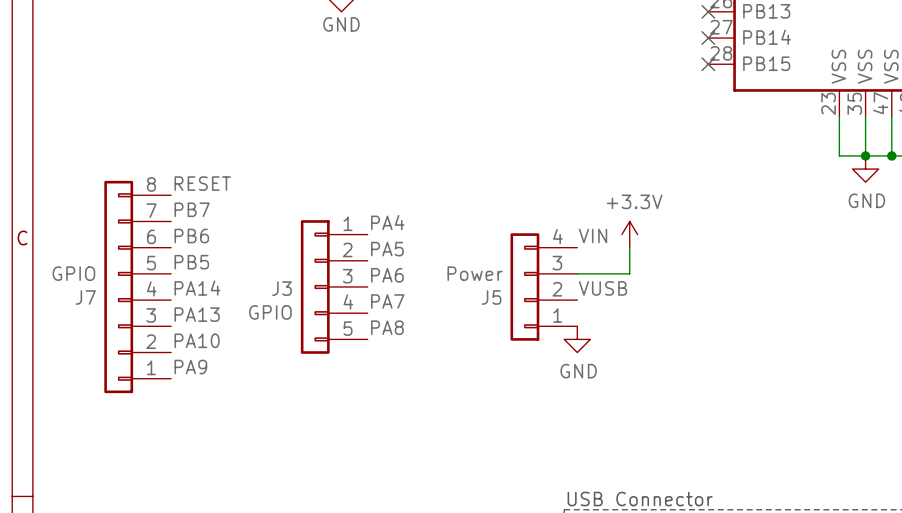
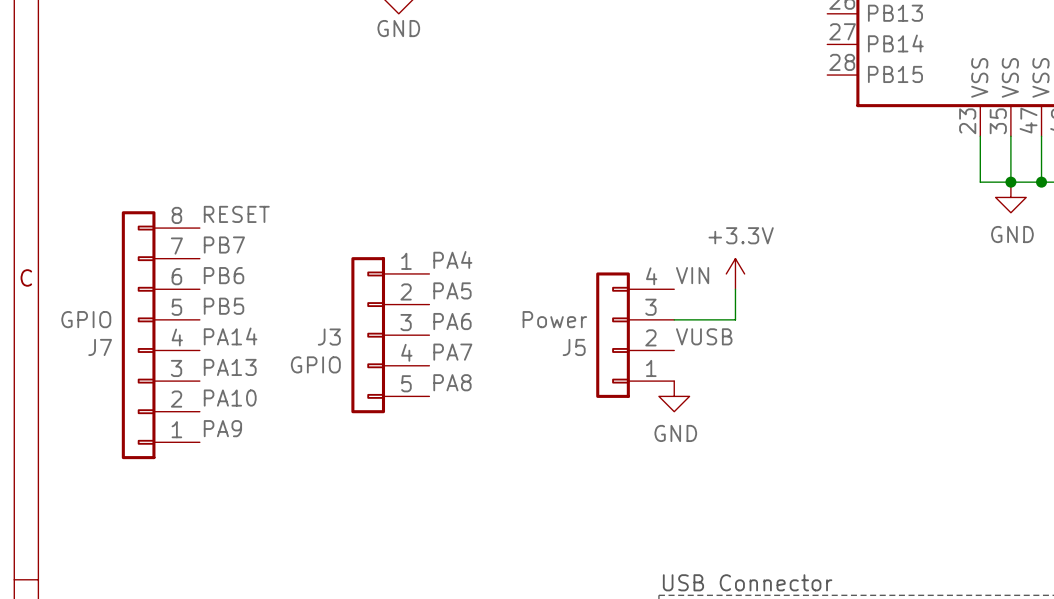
no-connect mark: (708, 11) -> none
no-connect mark: (708, 38) -> none
no-connect mark: (708, 64) -> none

